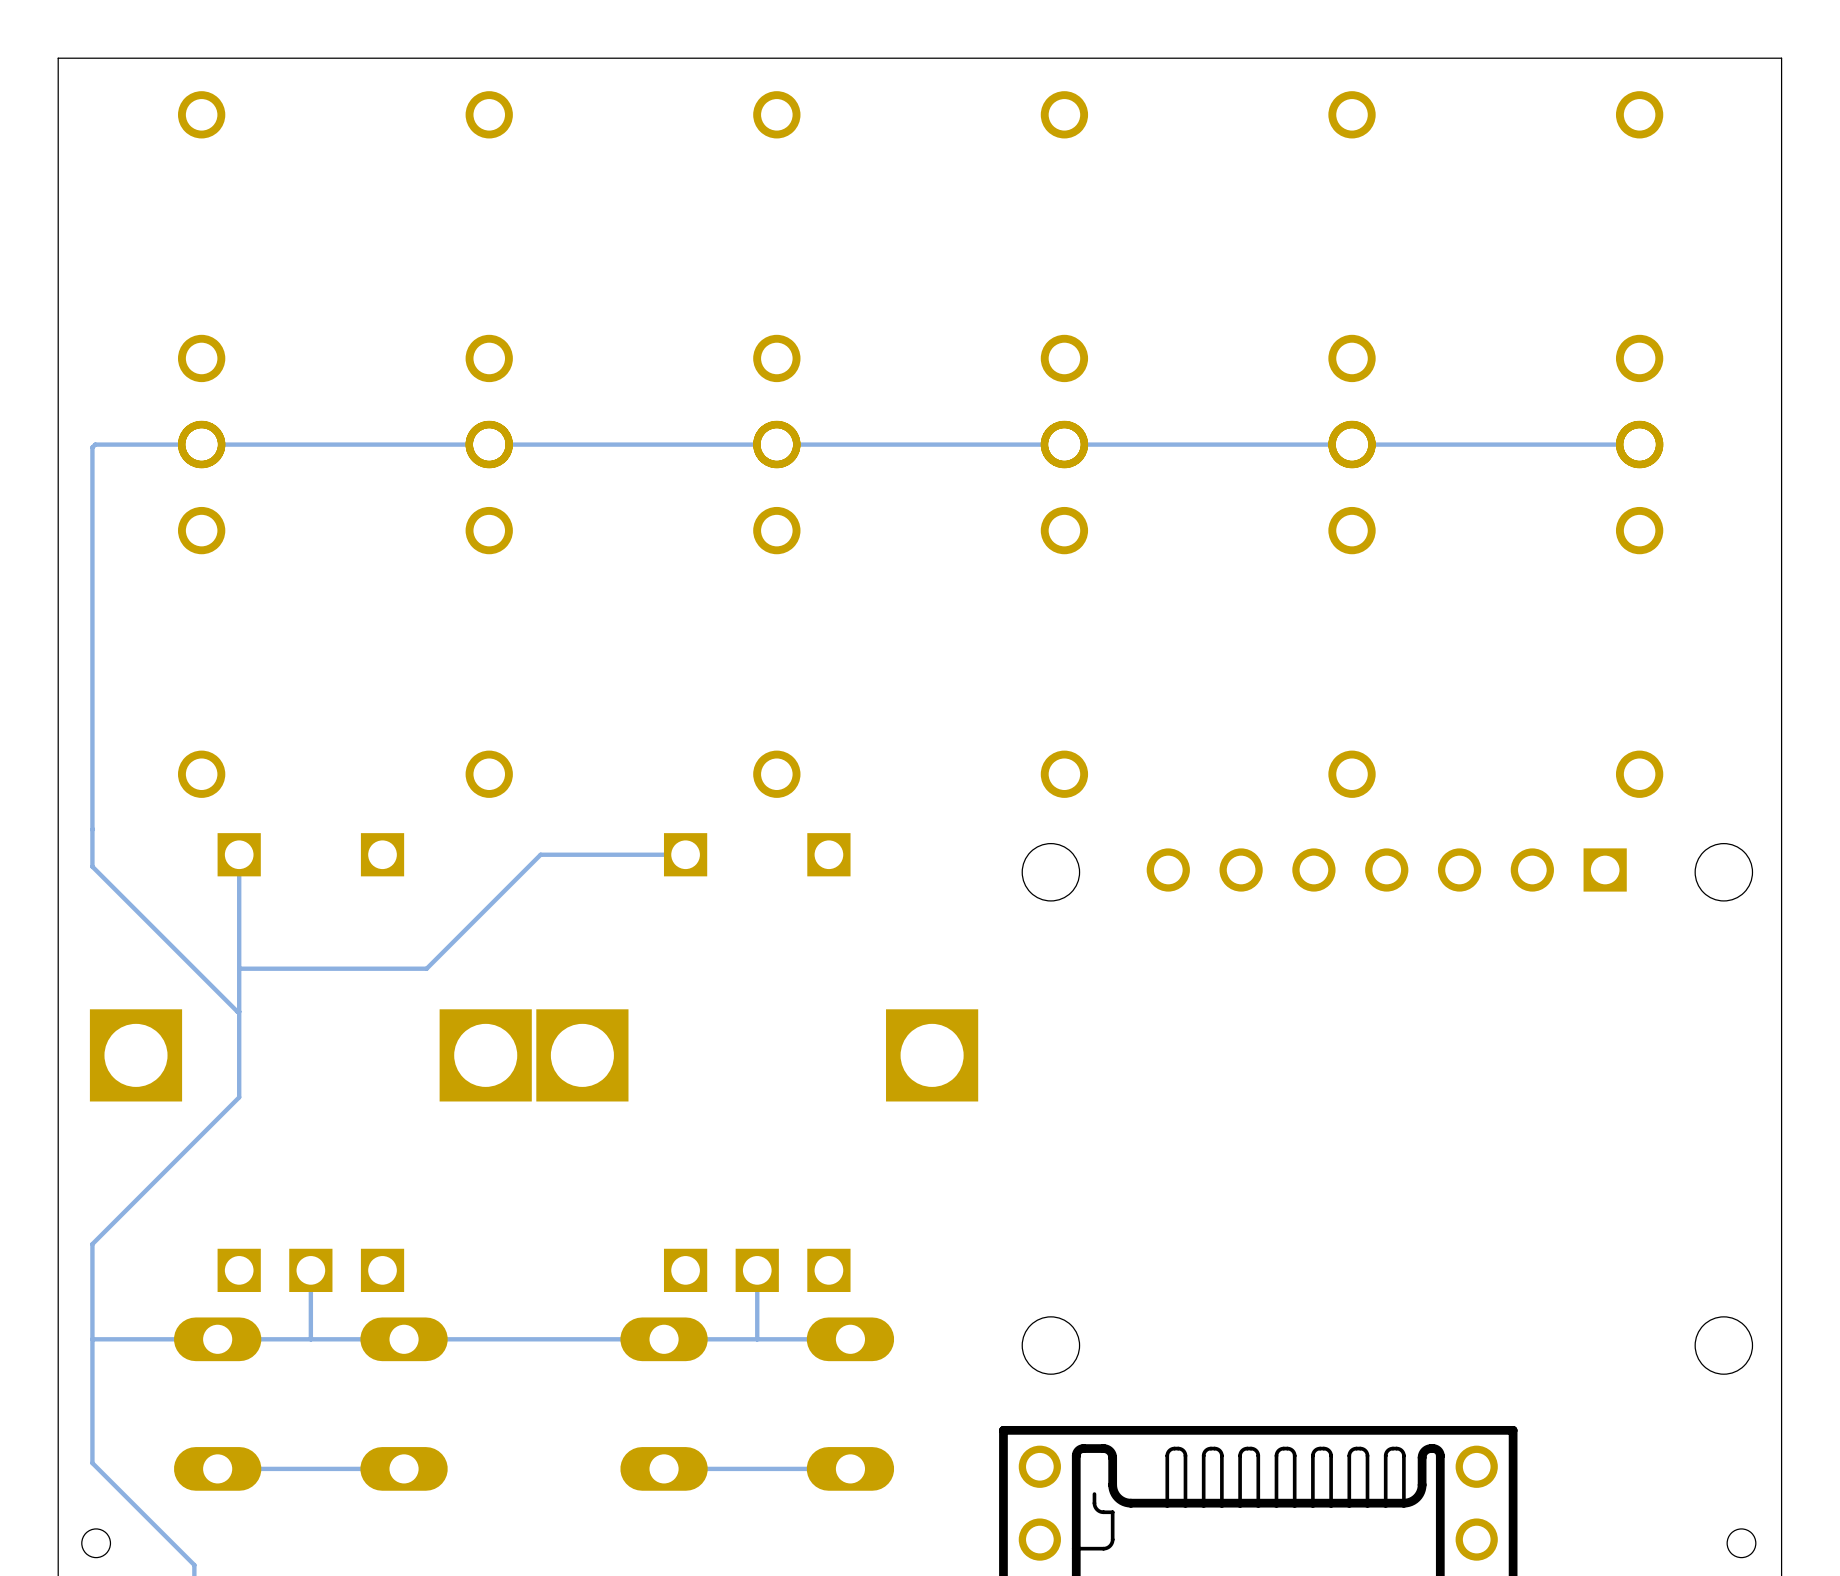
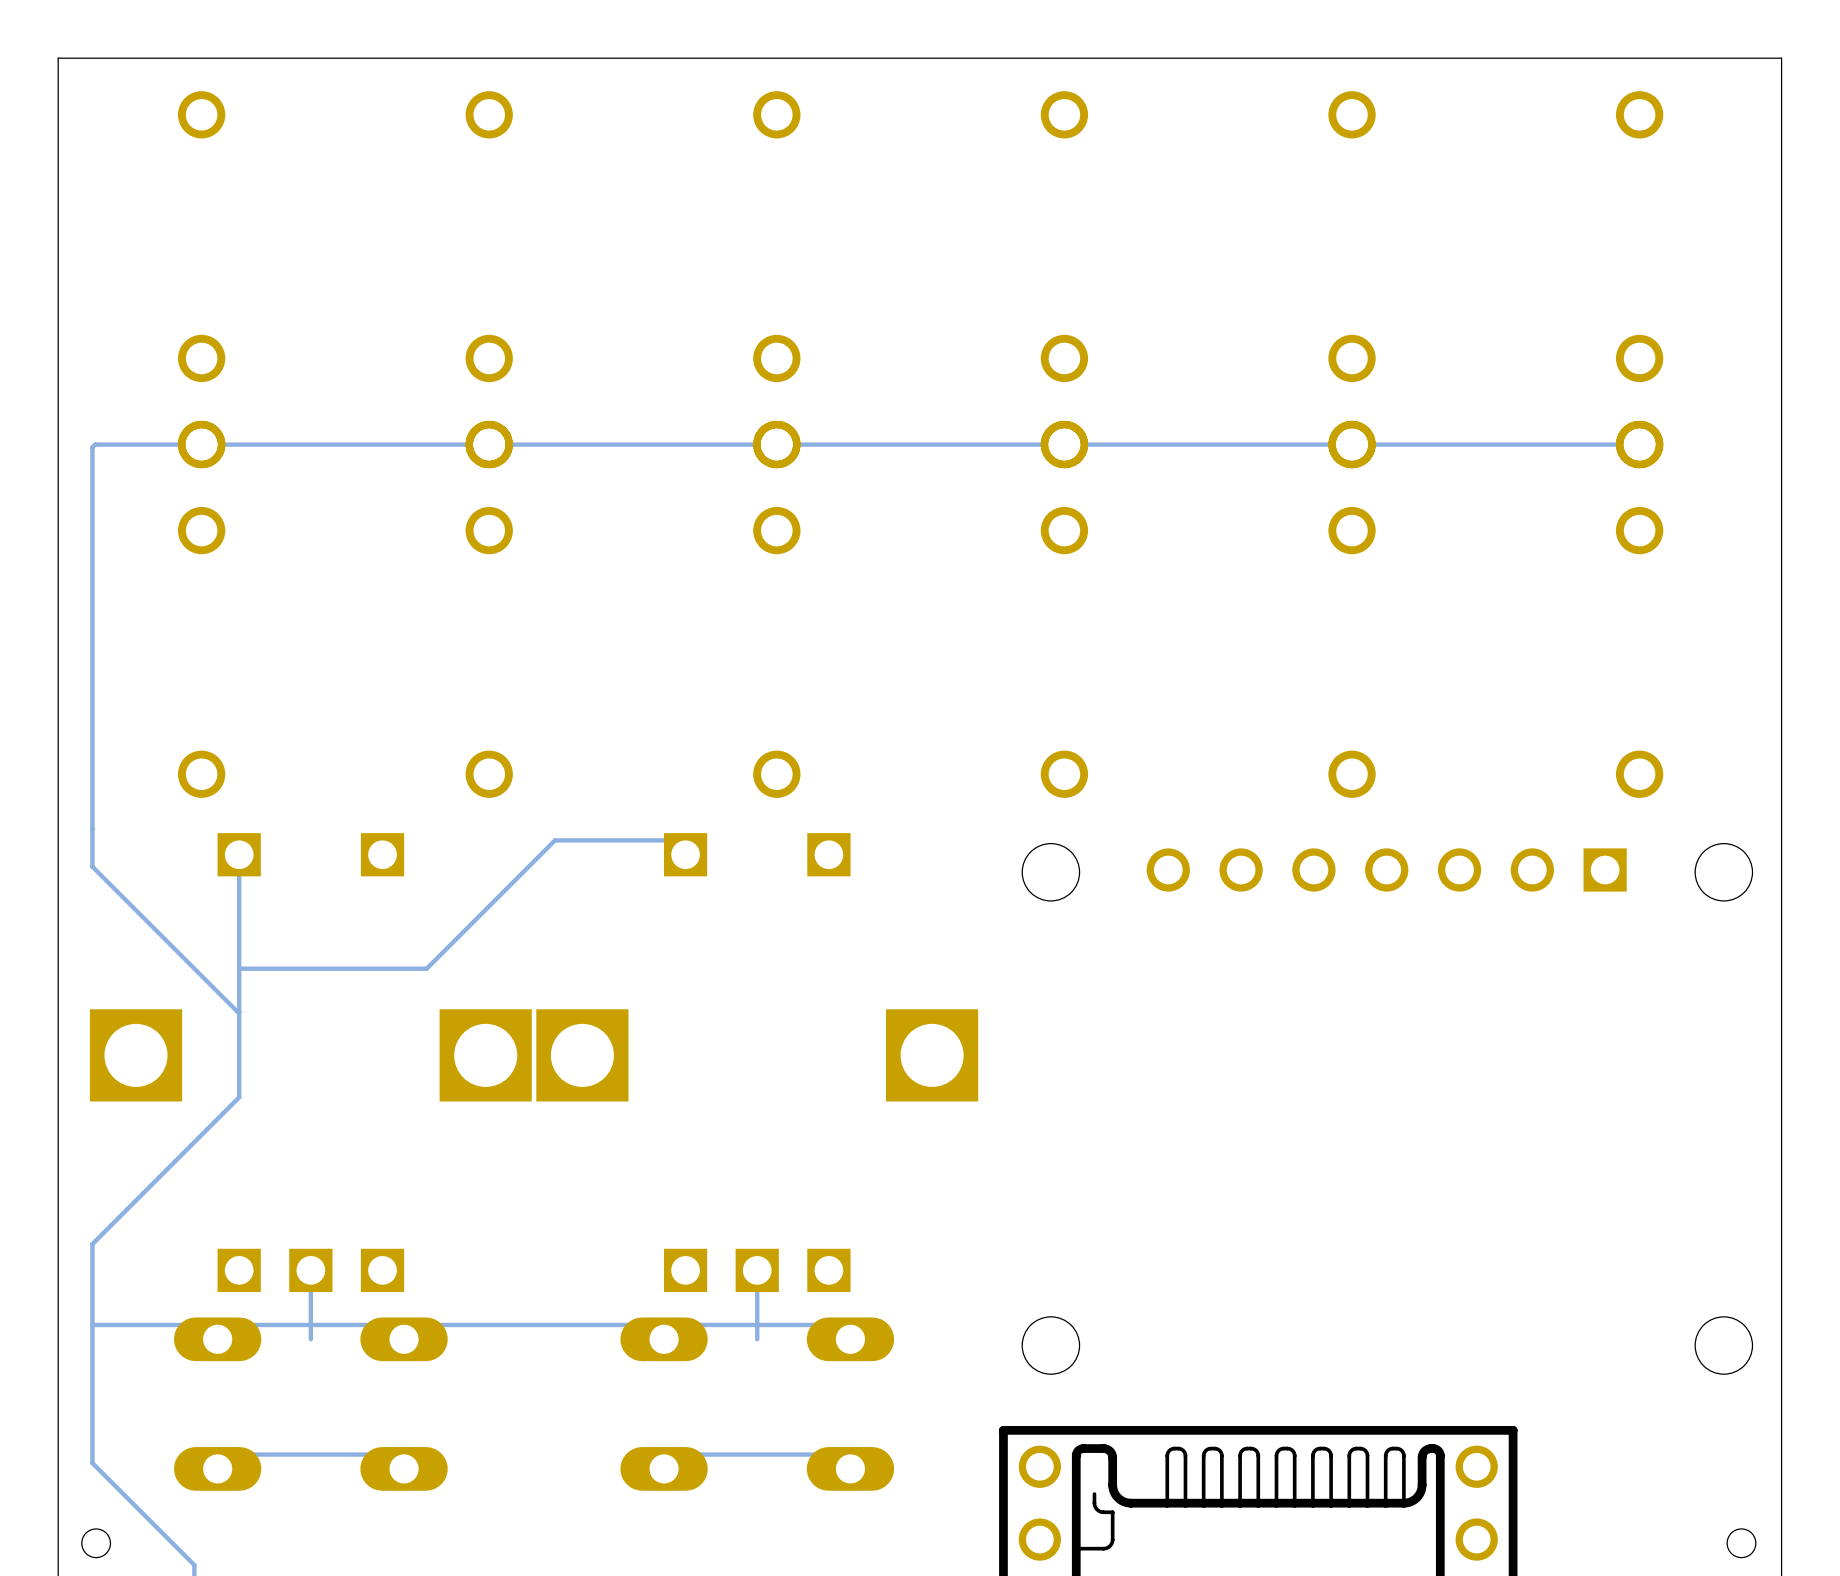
track: (685, 854) (540, 854) -> (685, 840) (554, 840) (540, 854)
track: (850, 1339) (92, 1339) -> (850, 1324) (92, 1324)
track: (404, 1468) (217, 1468) -> (404, 1454) (217, 1454)
track: (850, 1468) (664, 1468) -> (850, 1454) (664, 1454)

